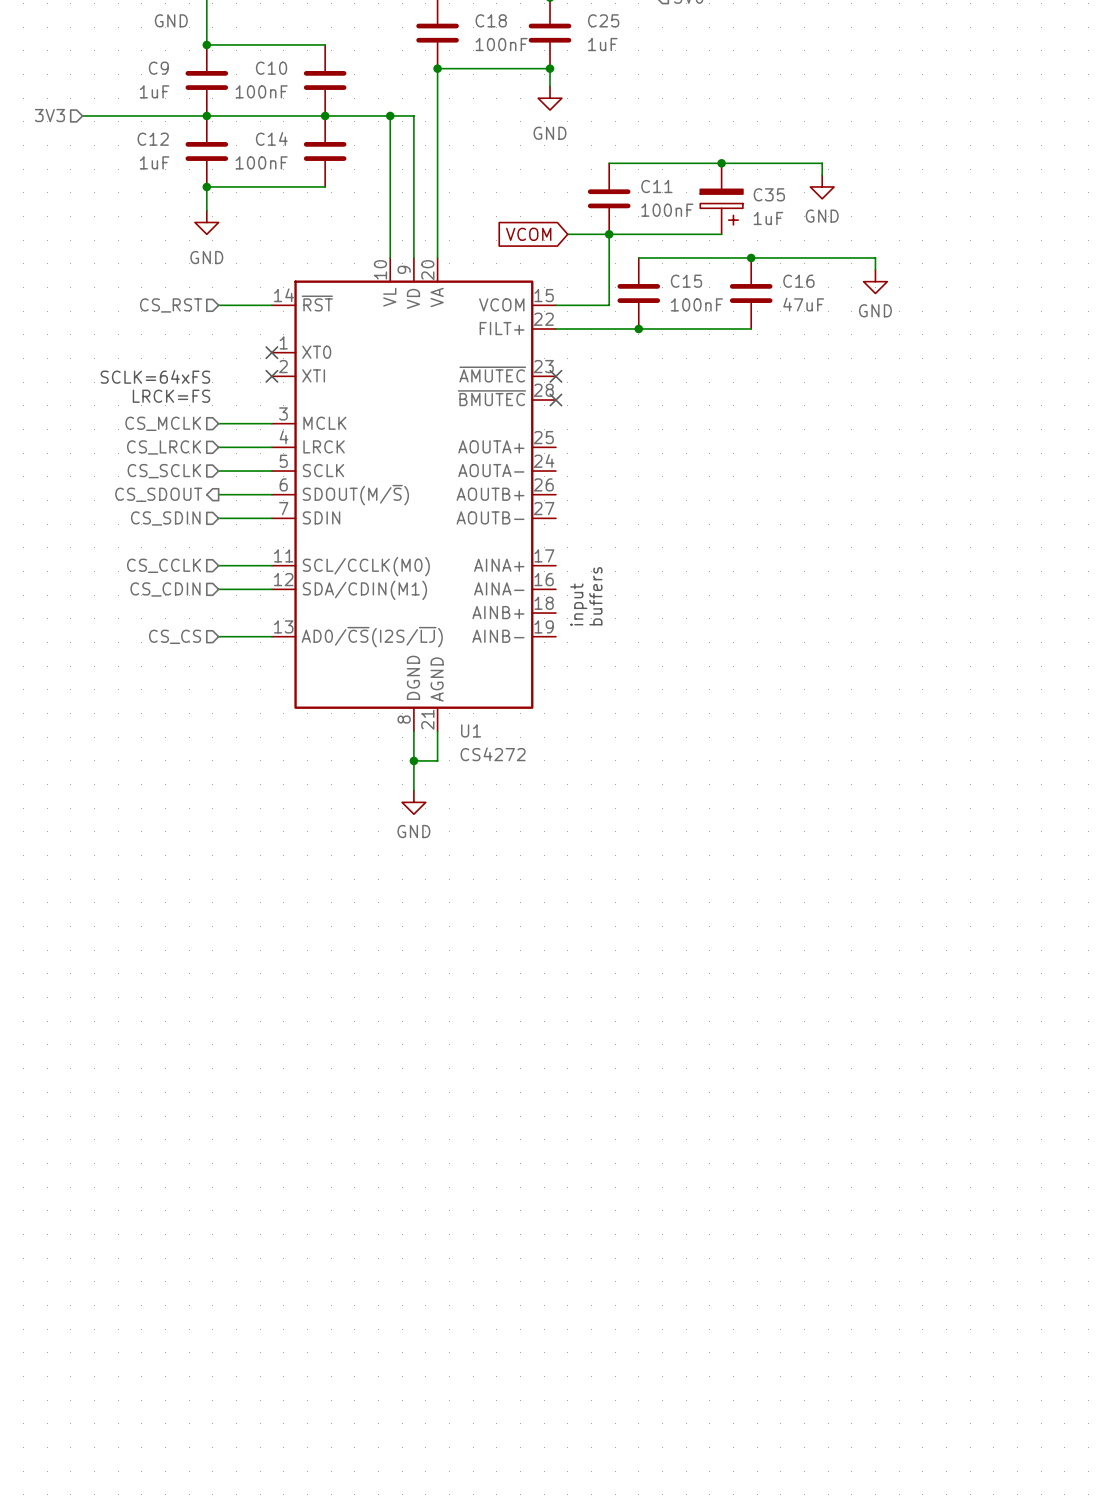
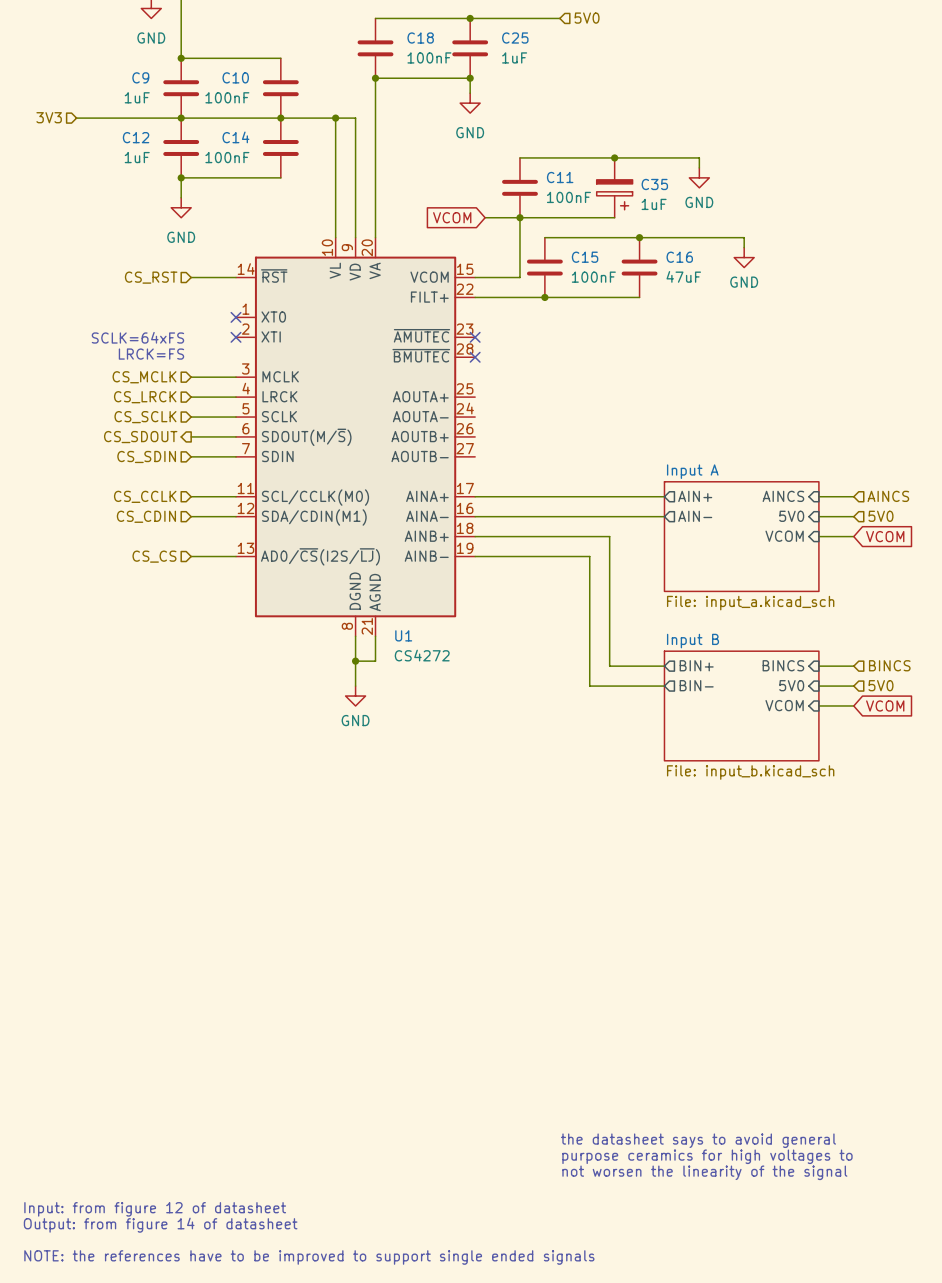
wire: none -> (475, 496) (664, 496)
sheet pin: none -> AIN+ (695, 496)
sheet pin: none -> AINCS (783, 496)
wire: none -> (818, 496) (853, 496)
hierarchical label: none -> AINCS (888, 496)
sheet pin: none -> AIN- (695, 516)
sheet pin: none -> 5V0 (791, 516)
hierarchical label: none -> 5V0 (880, 516)
wire: none -> (475, 516) (664, 516)
wire: none -> (818, 516) (853, 516)
text: buffers (595, 596) -> none
text: input (578, 604) -> none
sheet pin: none -> VCOM (784, 536)
wire: none -> (475, 536) (609, 536) (609, 666) (664, 666)
sheet Input A: none -> File: input_a.kicad_sch (741, 536)
wire: none -> (818, 536) (853, 536)
global label: none -> VCOM (885, 536)
wire: none -> (475, 556) (589, 556) (589, 686) (664, 686)
sheet pin: none -> BIN+ (696, 665)
sheet pin: none -> BINCS (783, 665)
wire: none -> (818, 666) (853, 666)
hierarchical label: none -> BINCS (889, 665)
sheet pin: none -> BIN- (696, 685)
sheet pin: none -> 5V0 (791, 685)
wire: none -> (818, 686) (853, 686)
hierarchical label: none -> 5V0 (880, 685)
sheet pin: none -> VCOM (784, 705)
sheet Input B: none -> File: input_b.kicad_sch (741, 705)
wire: none -> (818, 705) (853, 705)
global label: none -> VCOM (885, 705)
text: none -> the datasheet says to avoid general (698, 1140)
text: none -> purpose ceramics for high voltages to (707, 1156)
text: none -> not worsen the linearity of the signal (704, 1172)
text: none -> Input: from figure 12 of datasheet (155, 1209)
text: none -> Output: from figure 14 of datasheet (160, 1225)
text: none -> NOTE: the references have to be improved to support single ended signals (309, 1257)

